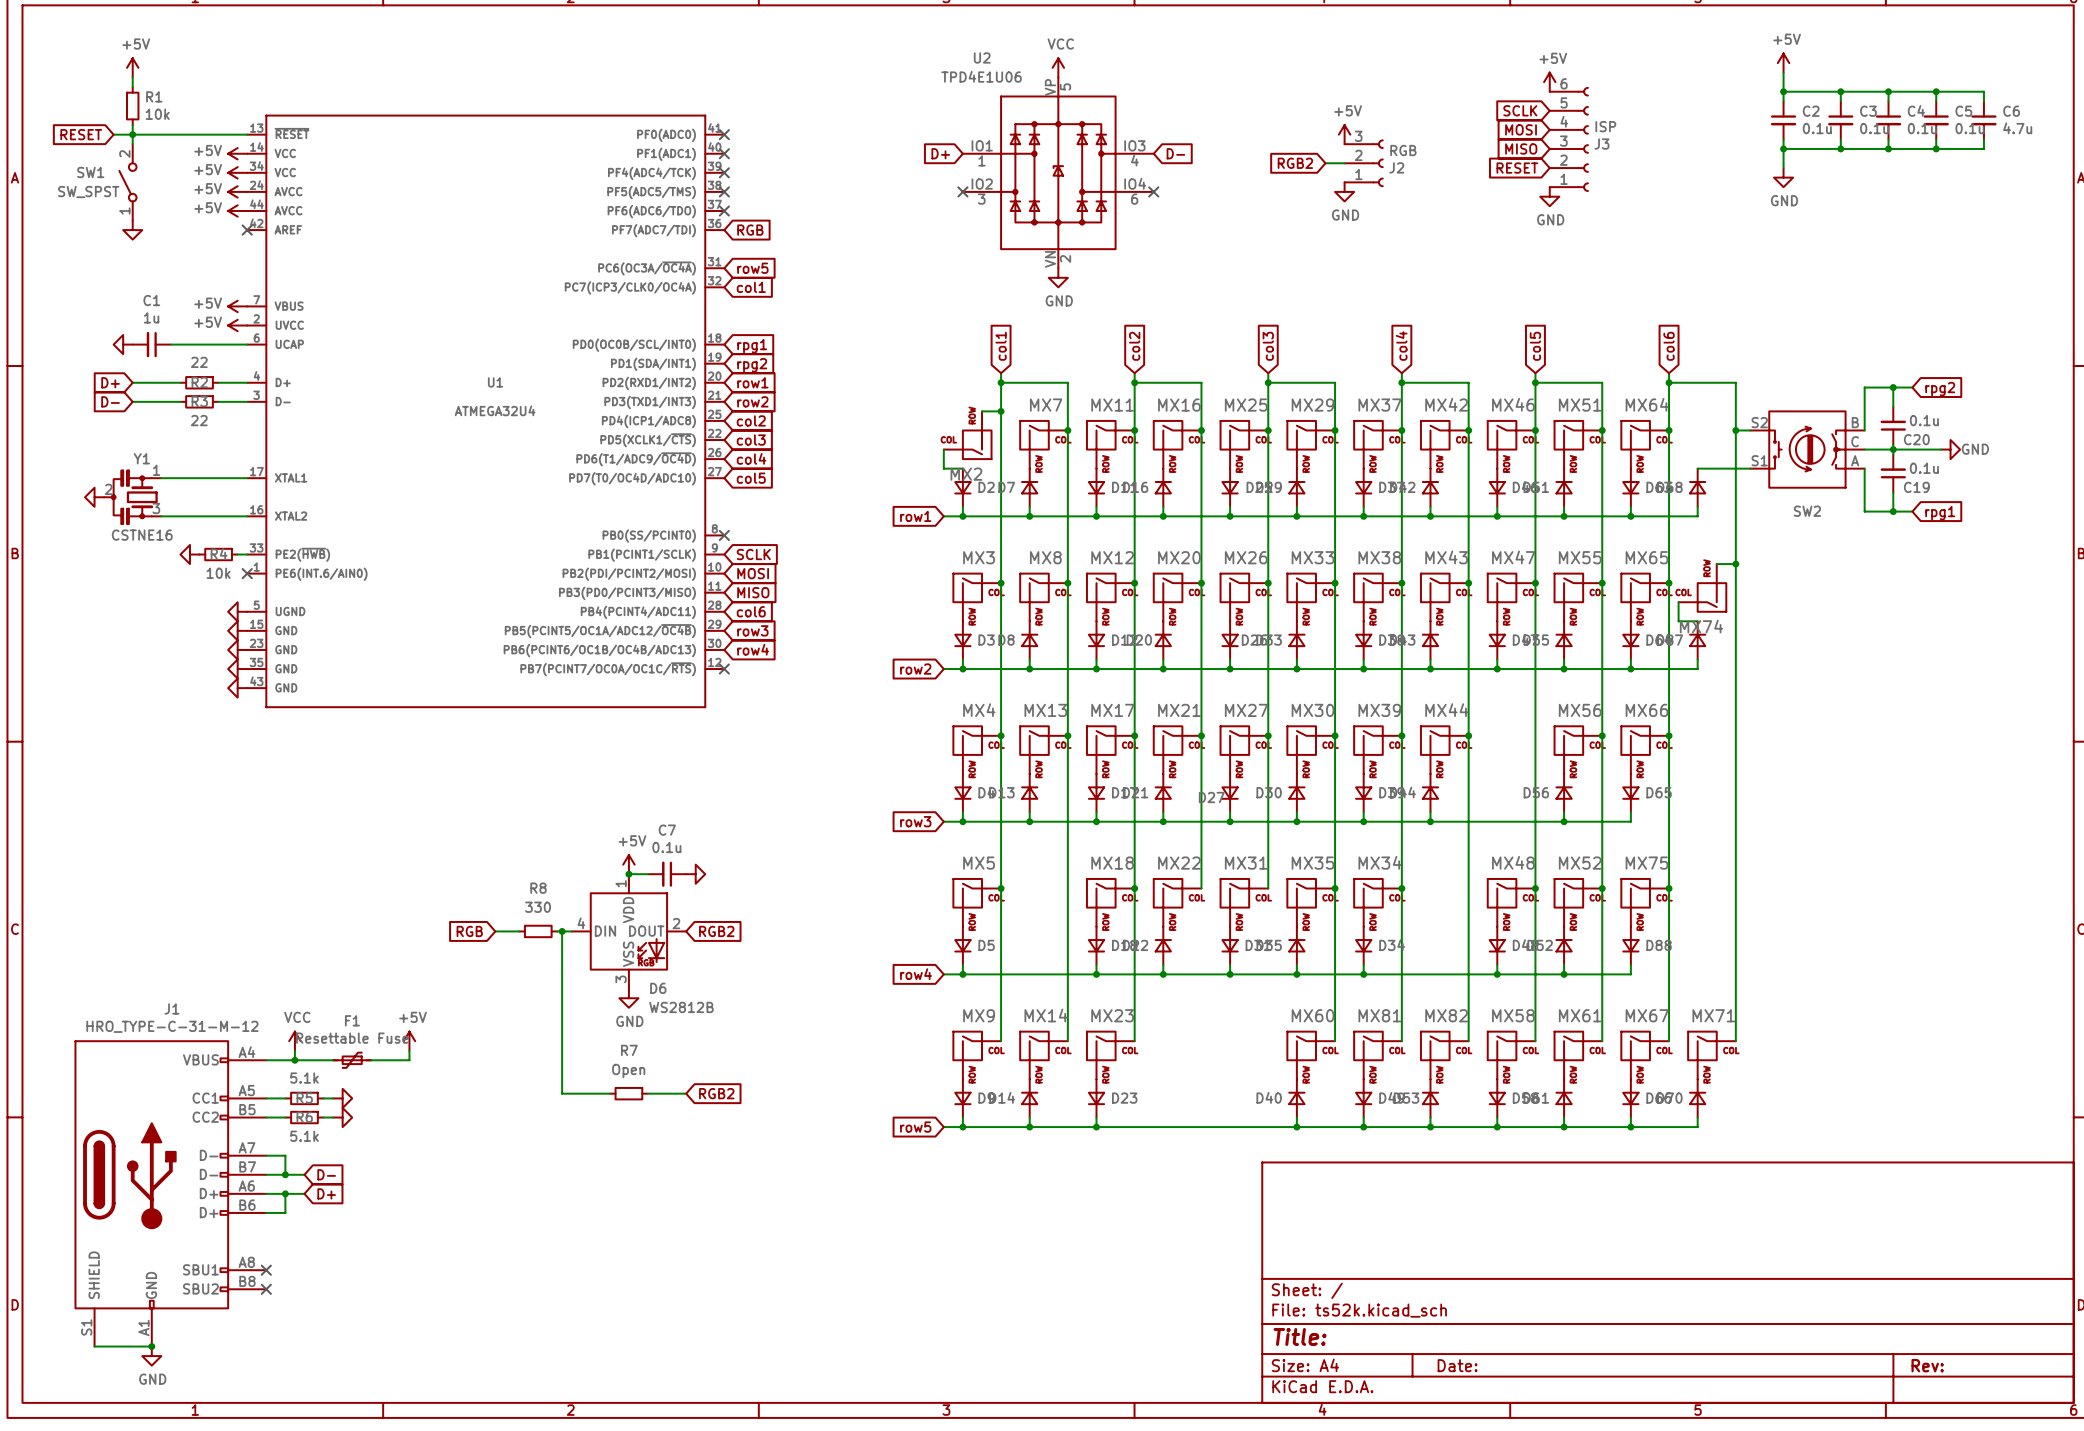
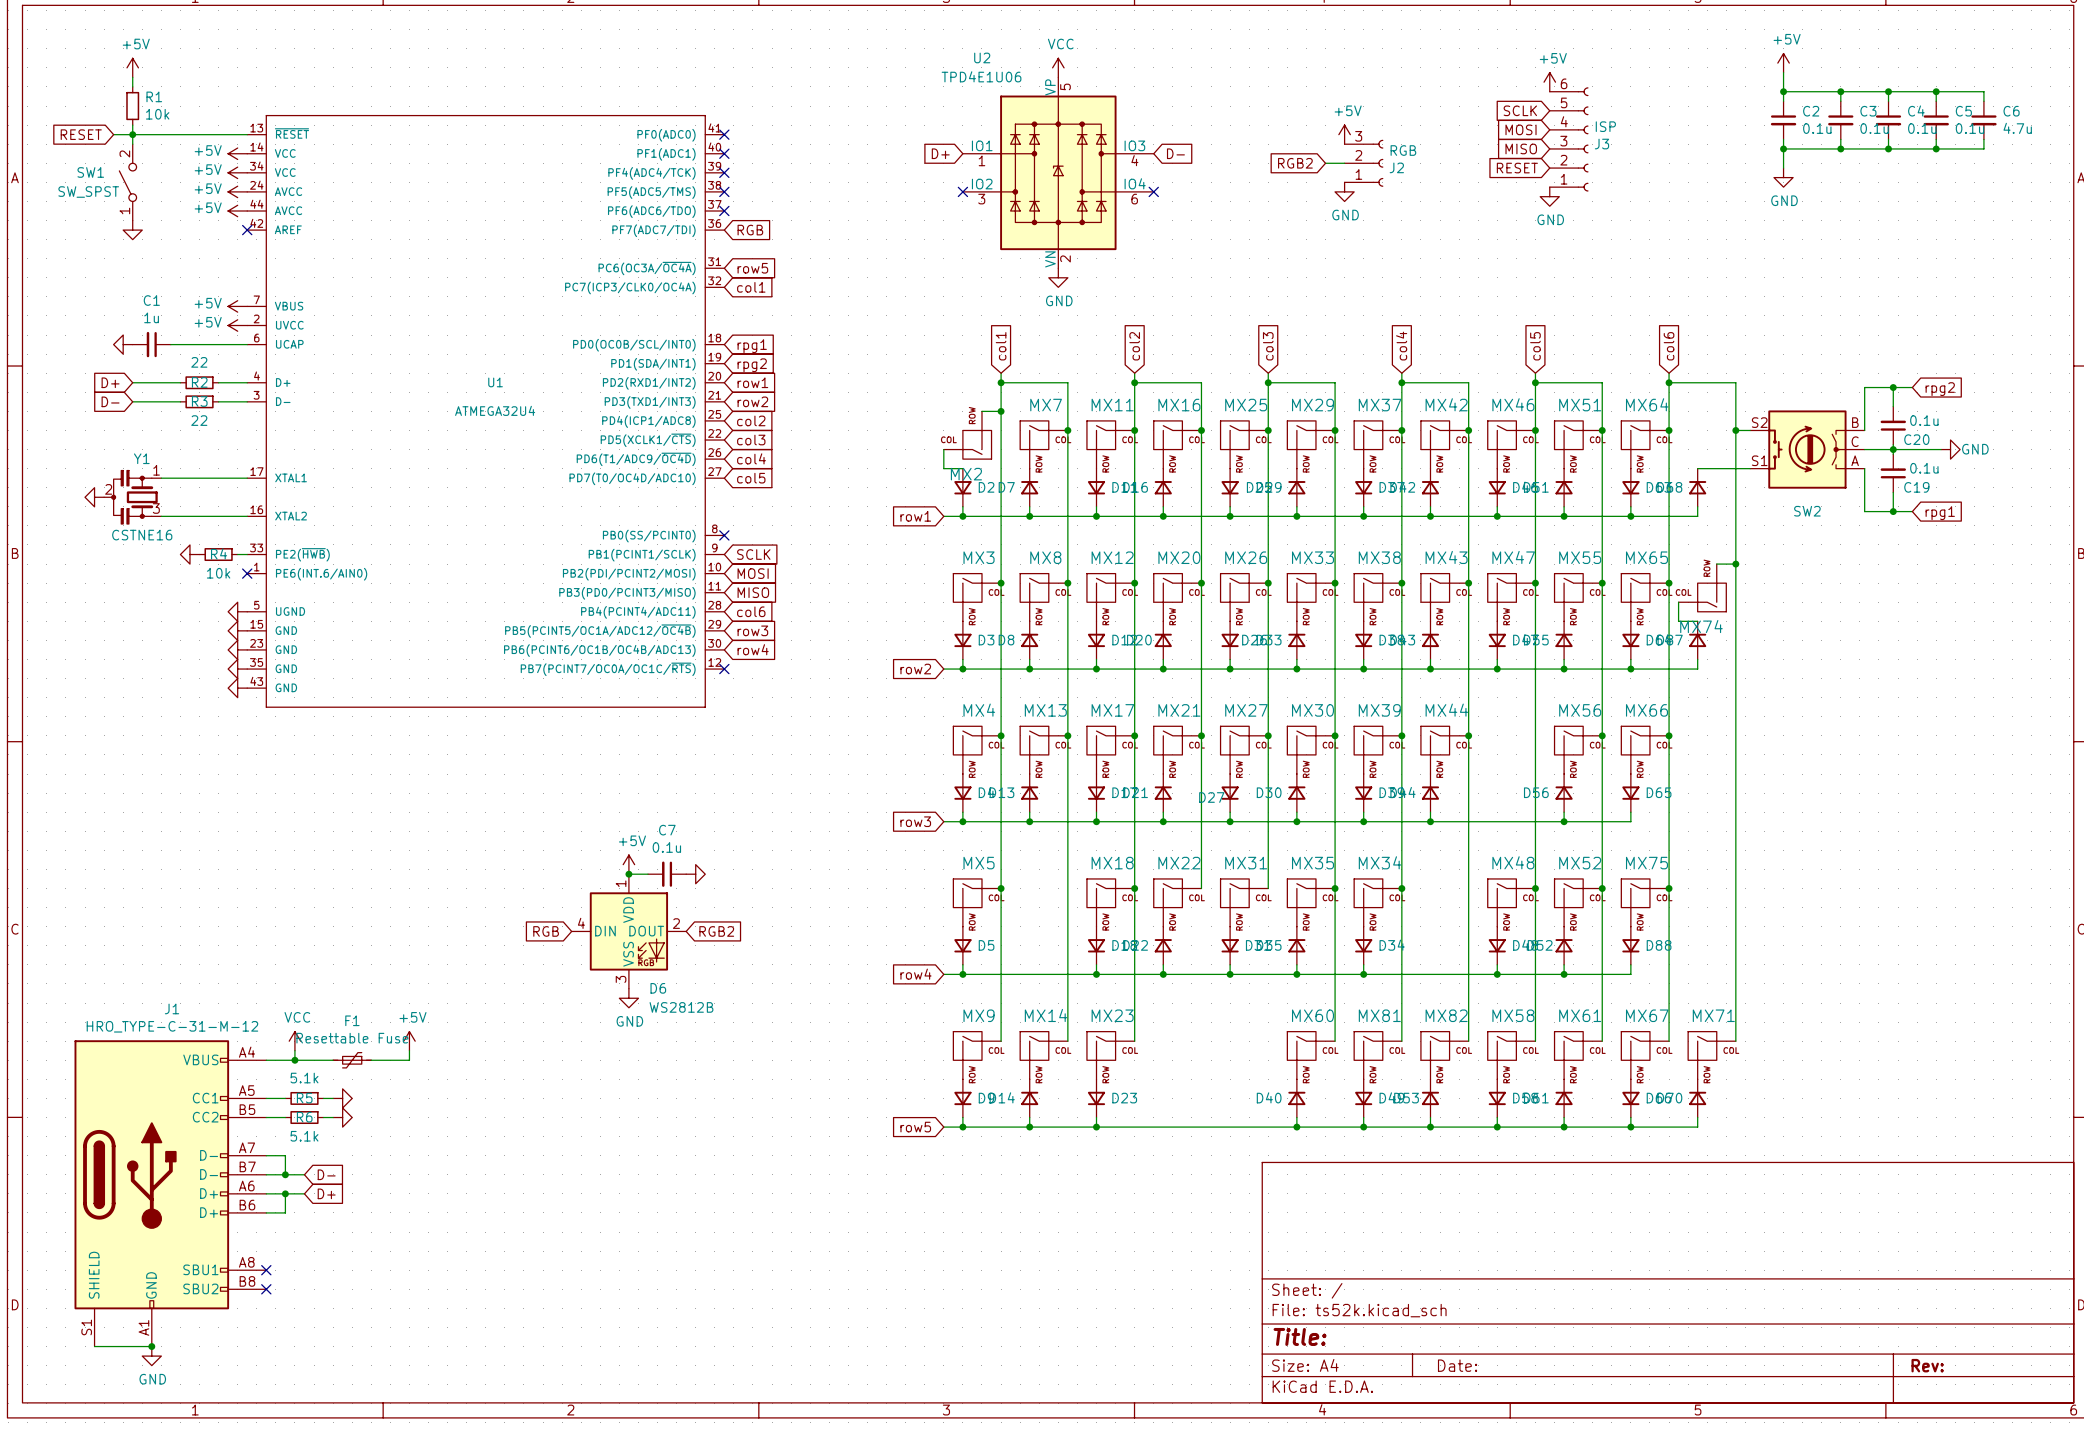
global label position: RGB (469, 931) -> RGB (546, 931)
wire: (495, 931) (519, 931) -> none
R8: 330 (538, 931) -> none
wire: (557, 931) (571, 931) -> none
wire: (562, 931) (562, 1093) (609, 1093) -> none
junction: (562, 931) -> none
R7: Open (628, 1093) -> none
wire: (648, 1093) (686, 1093) -> none
global label: RGB2 (716, 1093) -> none

